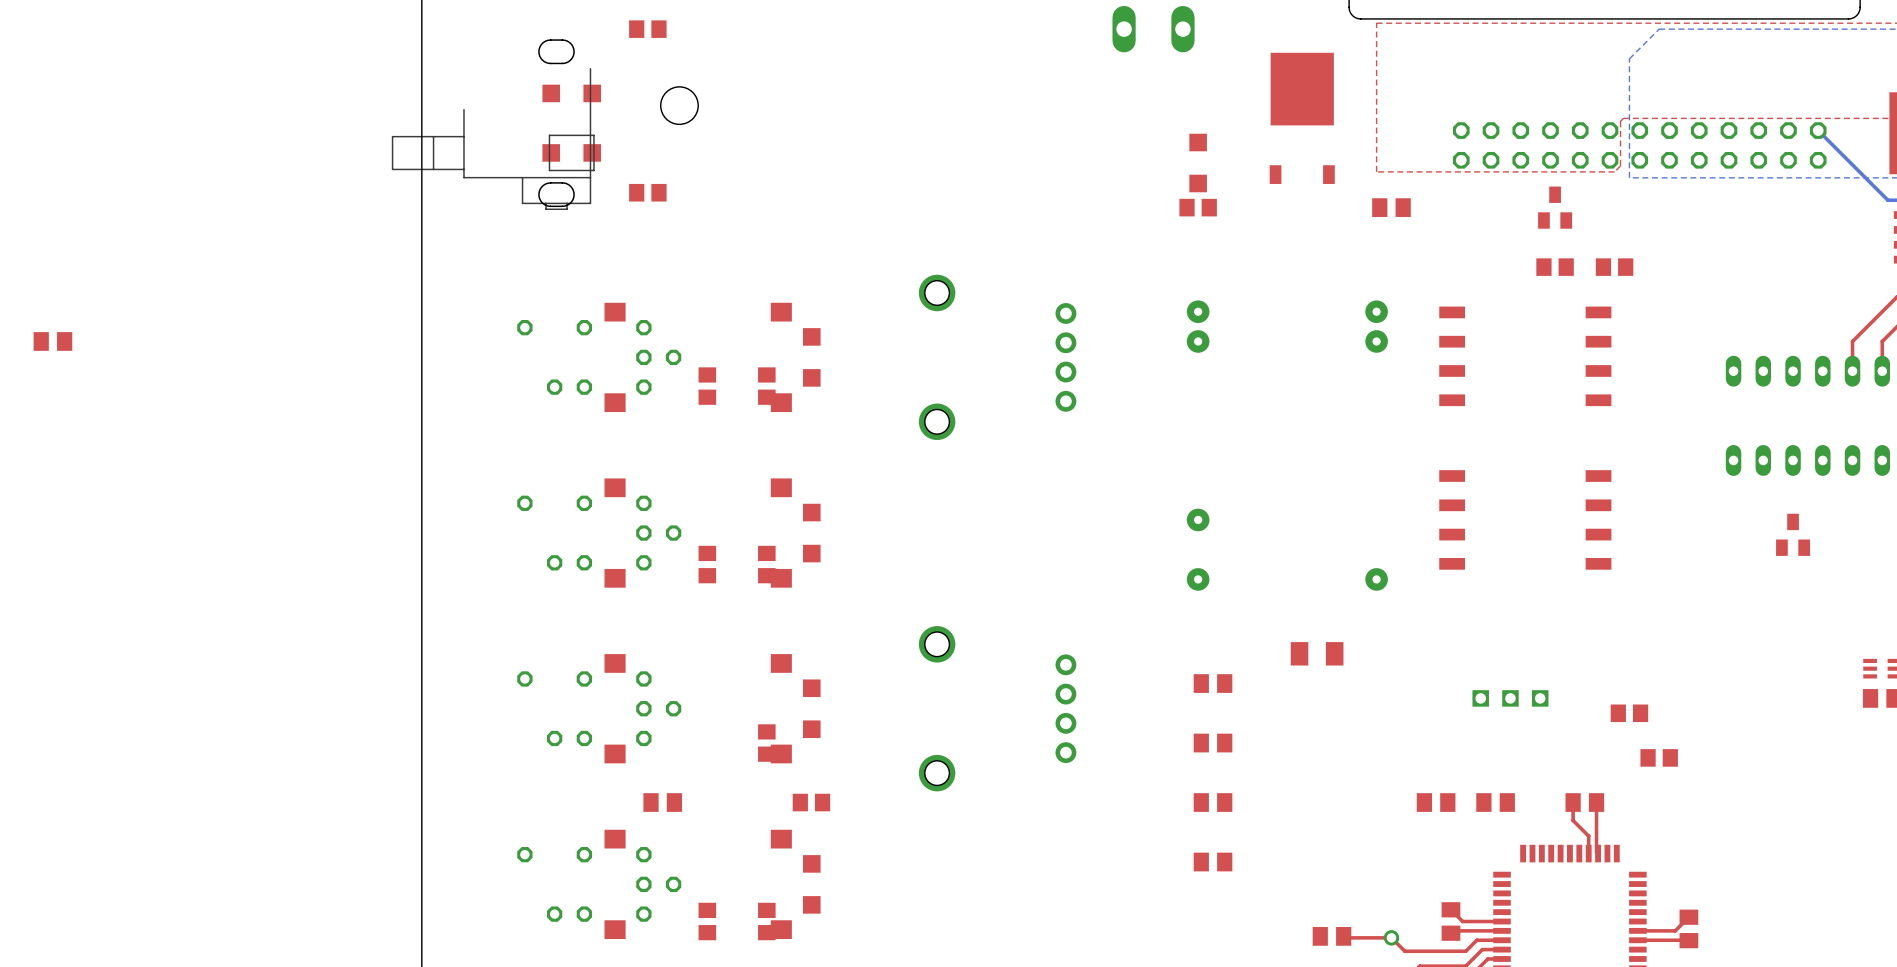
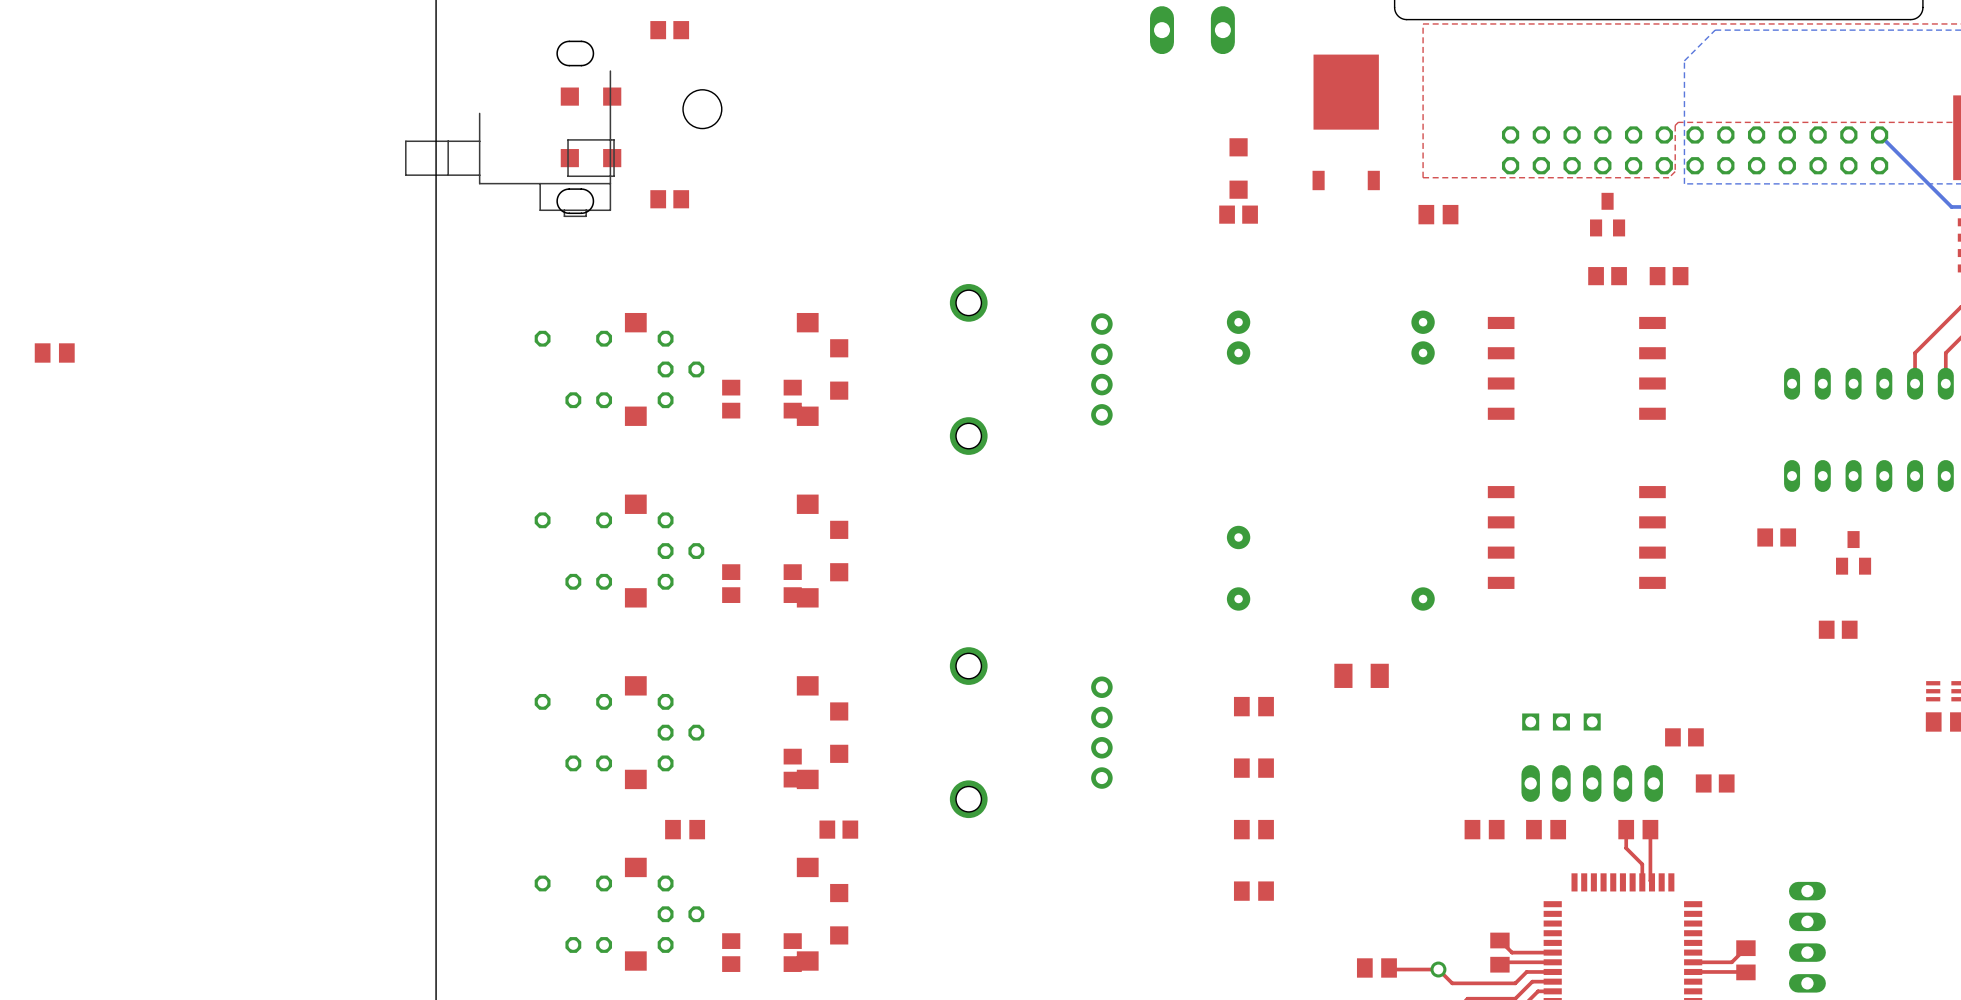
part: none -> (1776, 537)
part: none -> (1838, 629)
part: none -> (1592, 783)
part: none -> (1807, 937)

